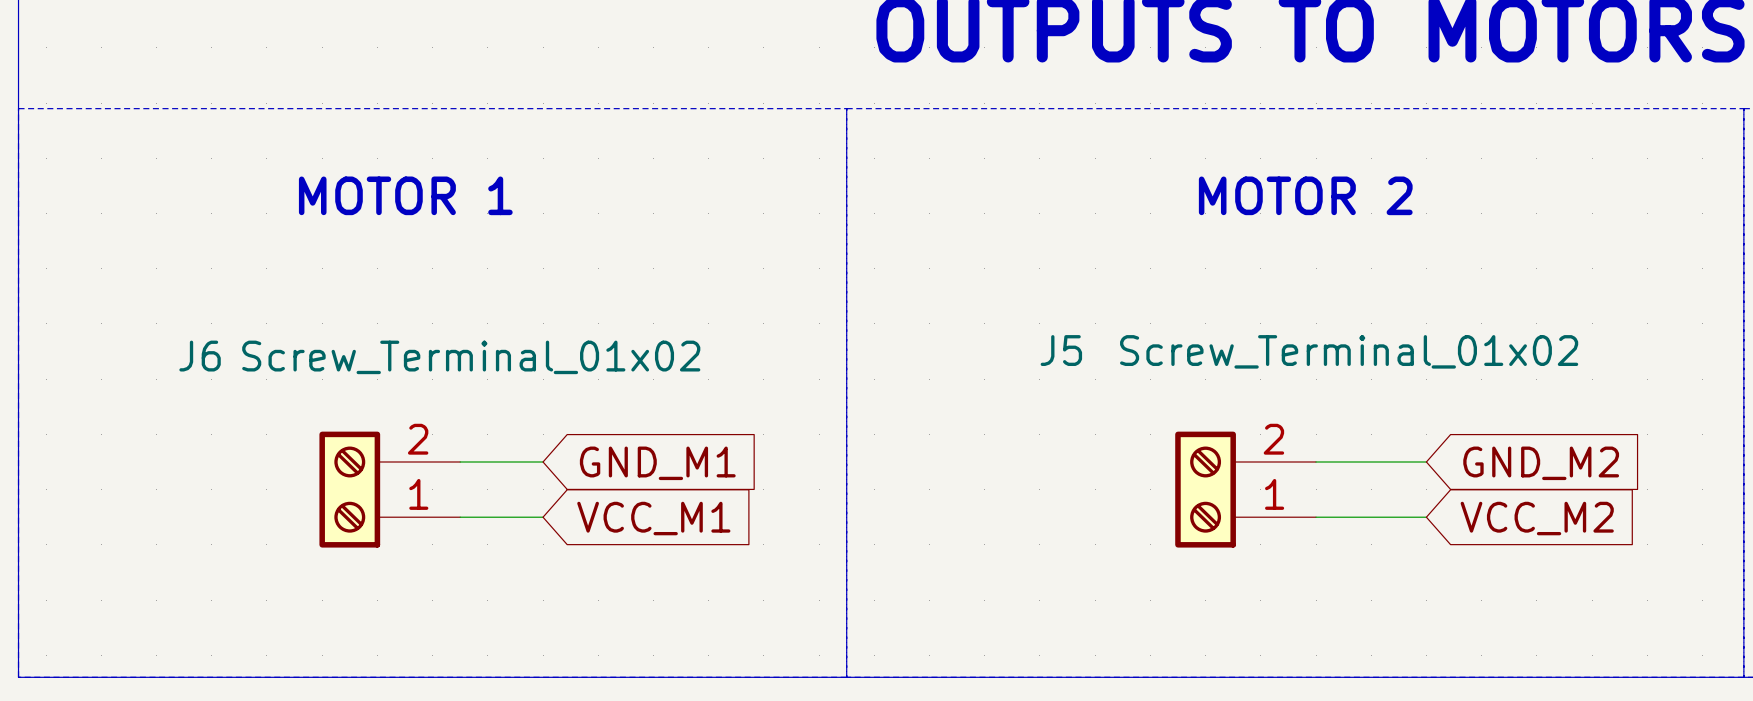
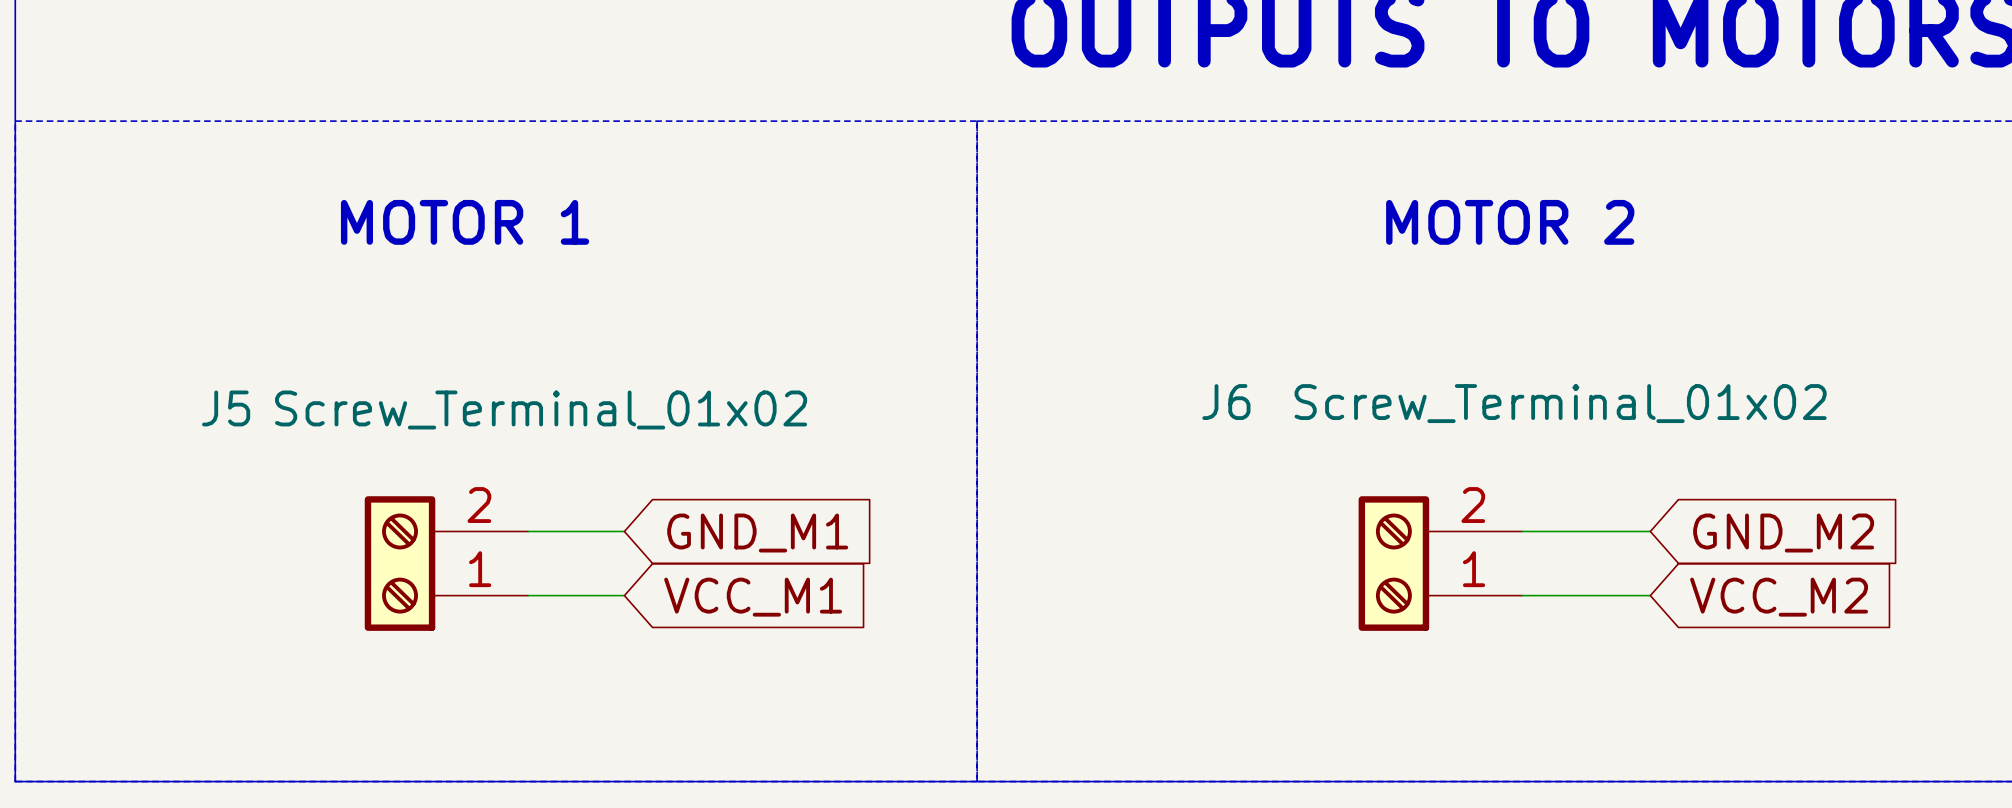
J5 name: J5 (1061, 350) -> J6 (1226, 402)
J6 name: J6 (200, 356) -> J5 (226, 408)

